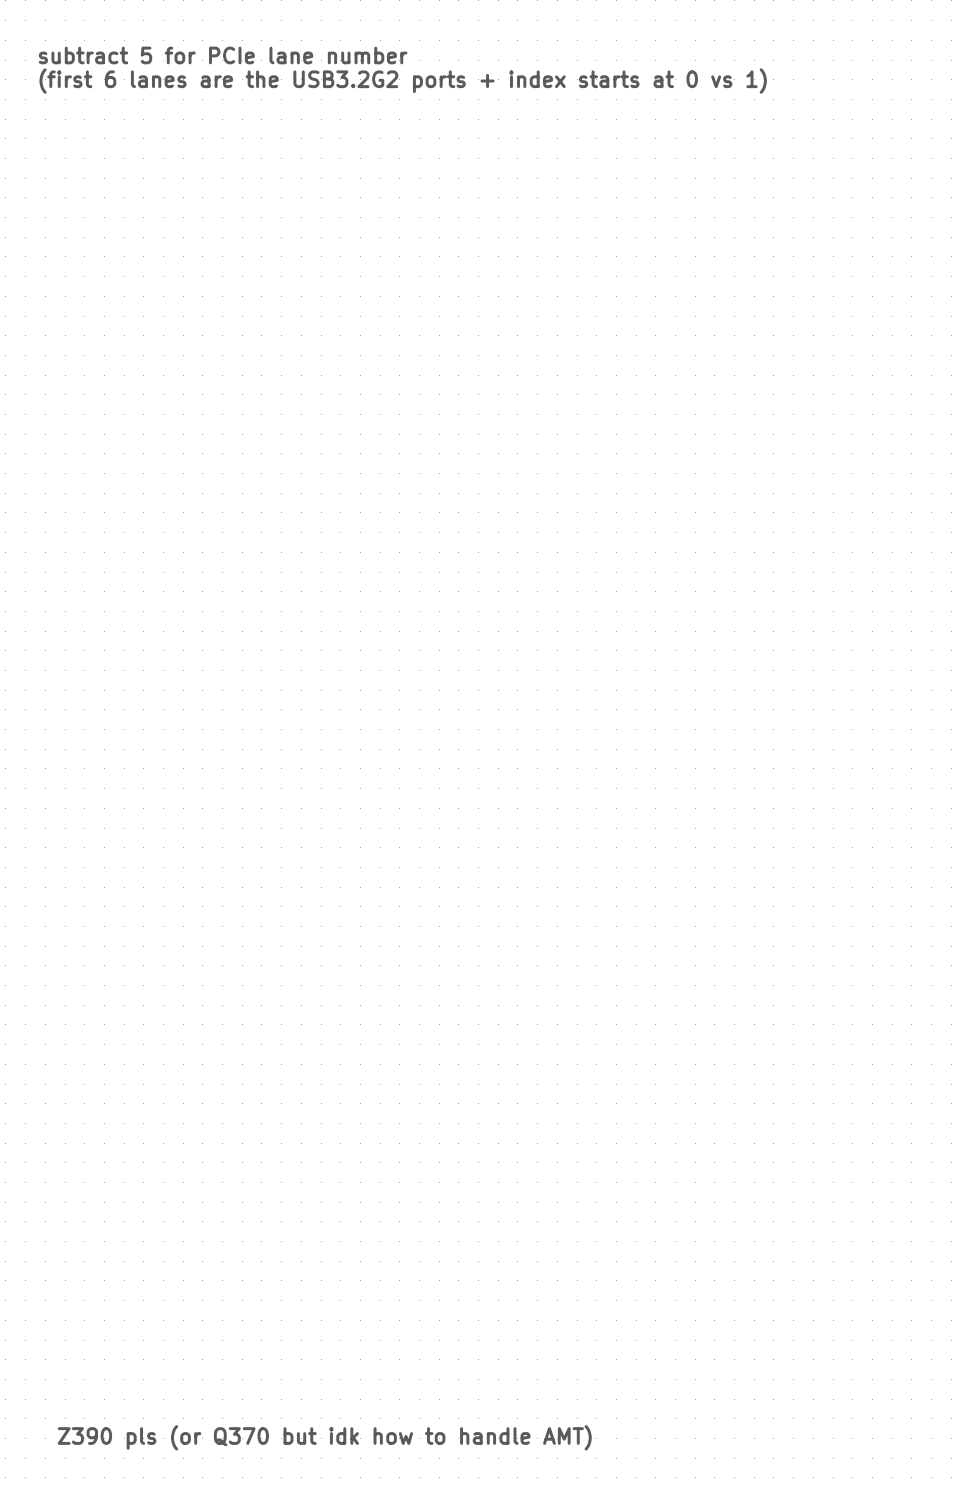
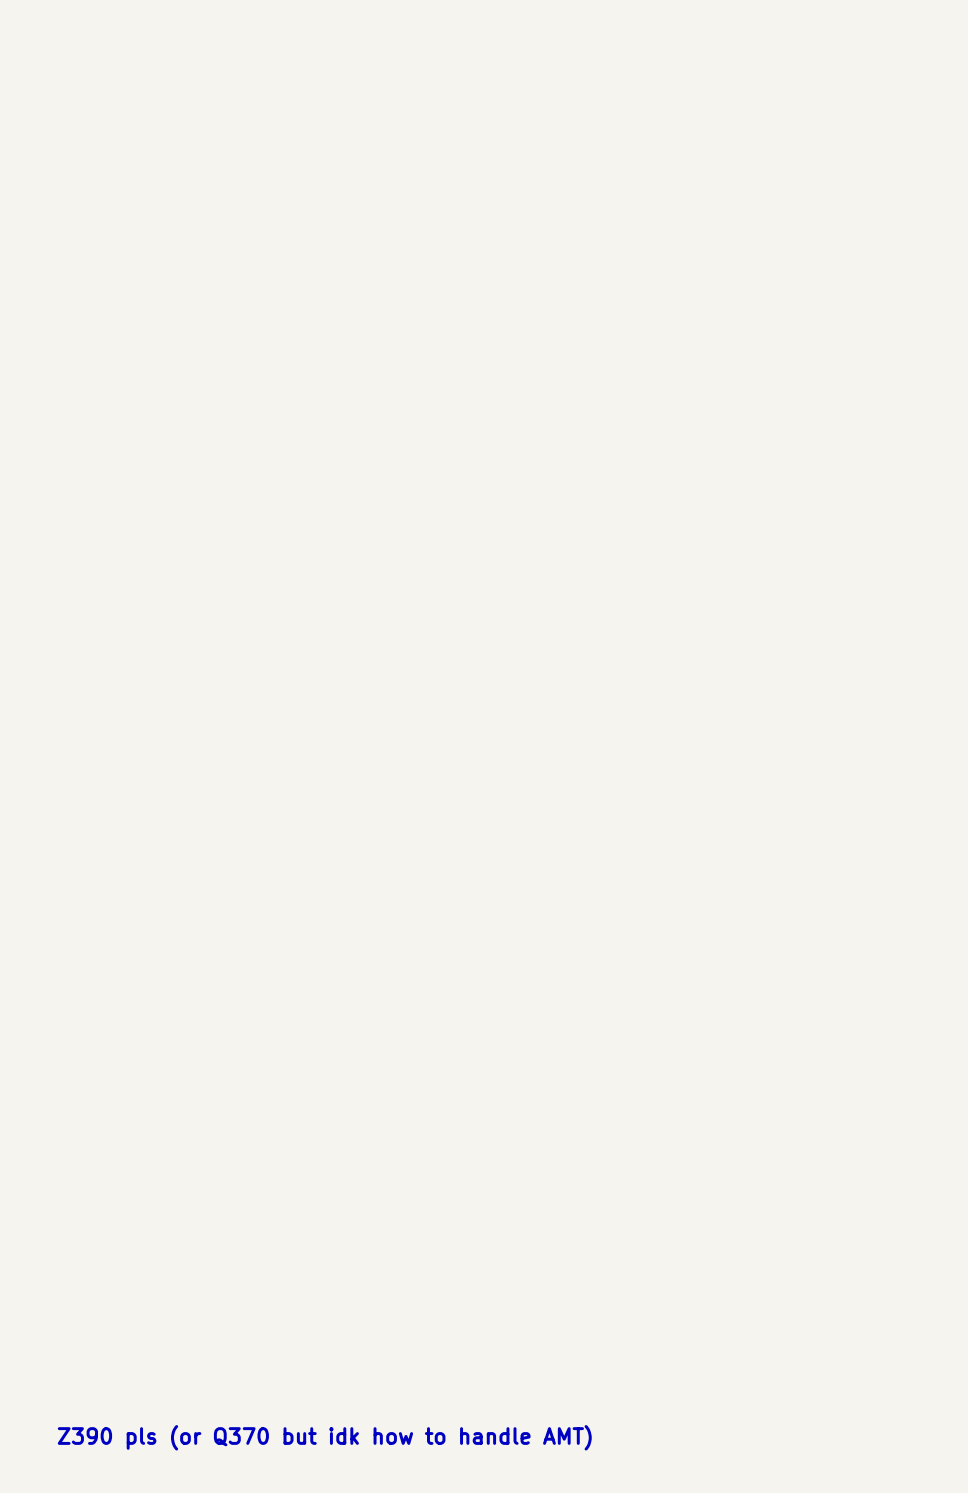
text: subtract 5 for PCIe lane number (223, 55) -> none
text: (first 6 lanes are the USB3.2G2 ports + index starts at 0 vs 1) (403, 81) -> none

